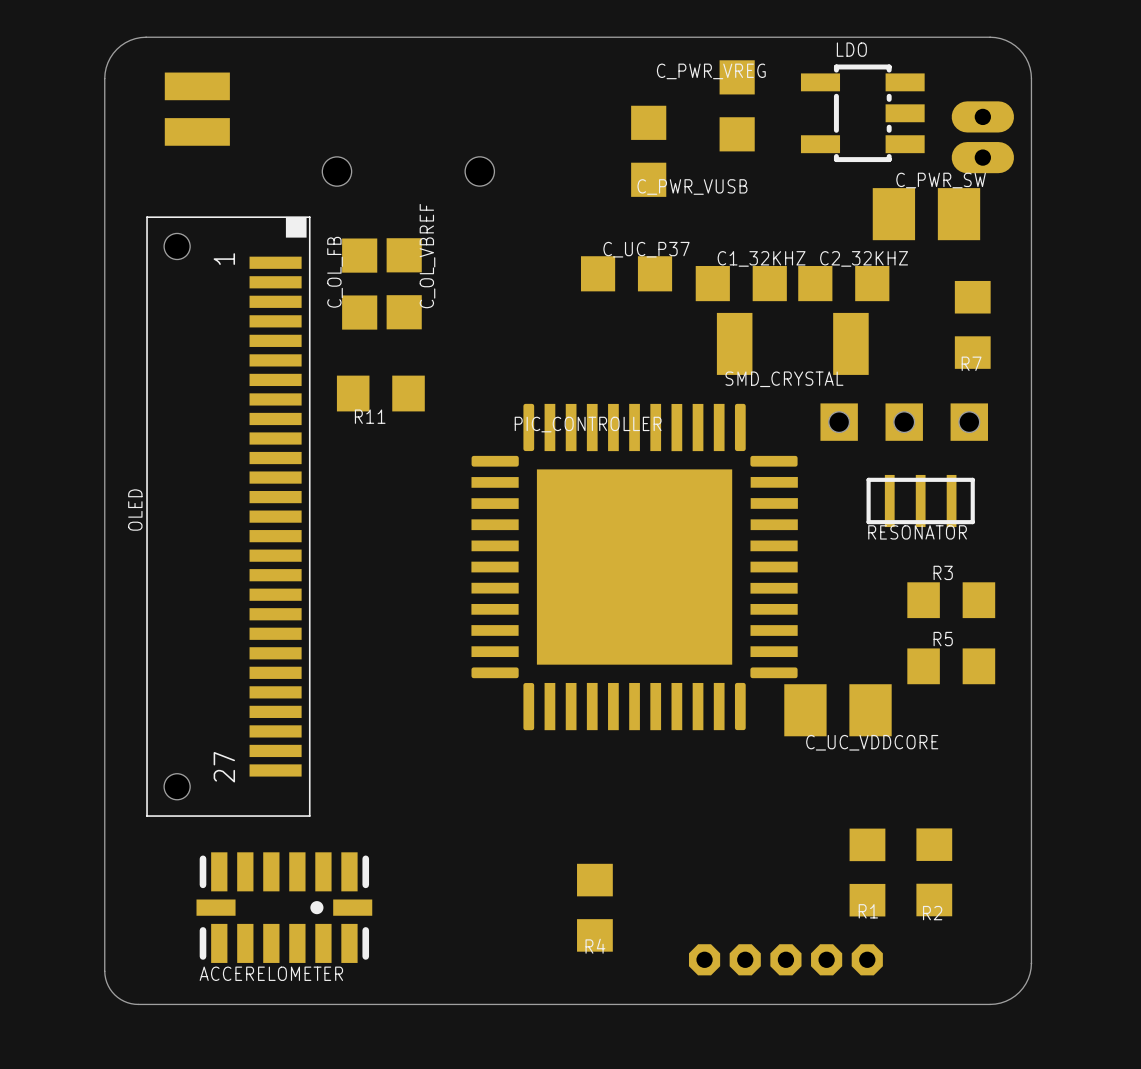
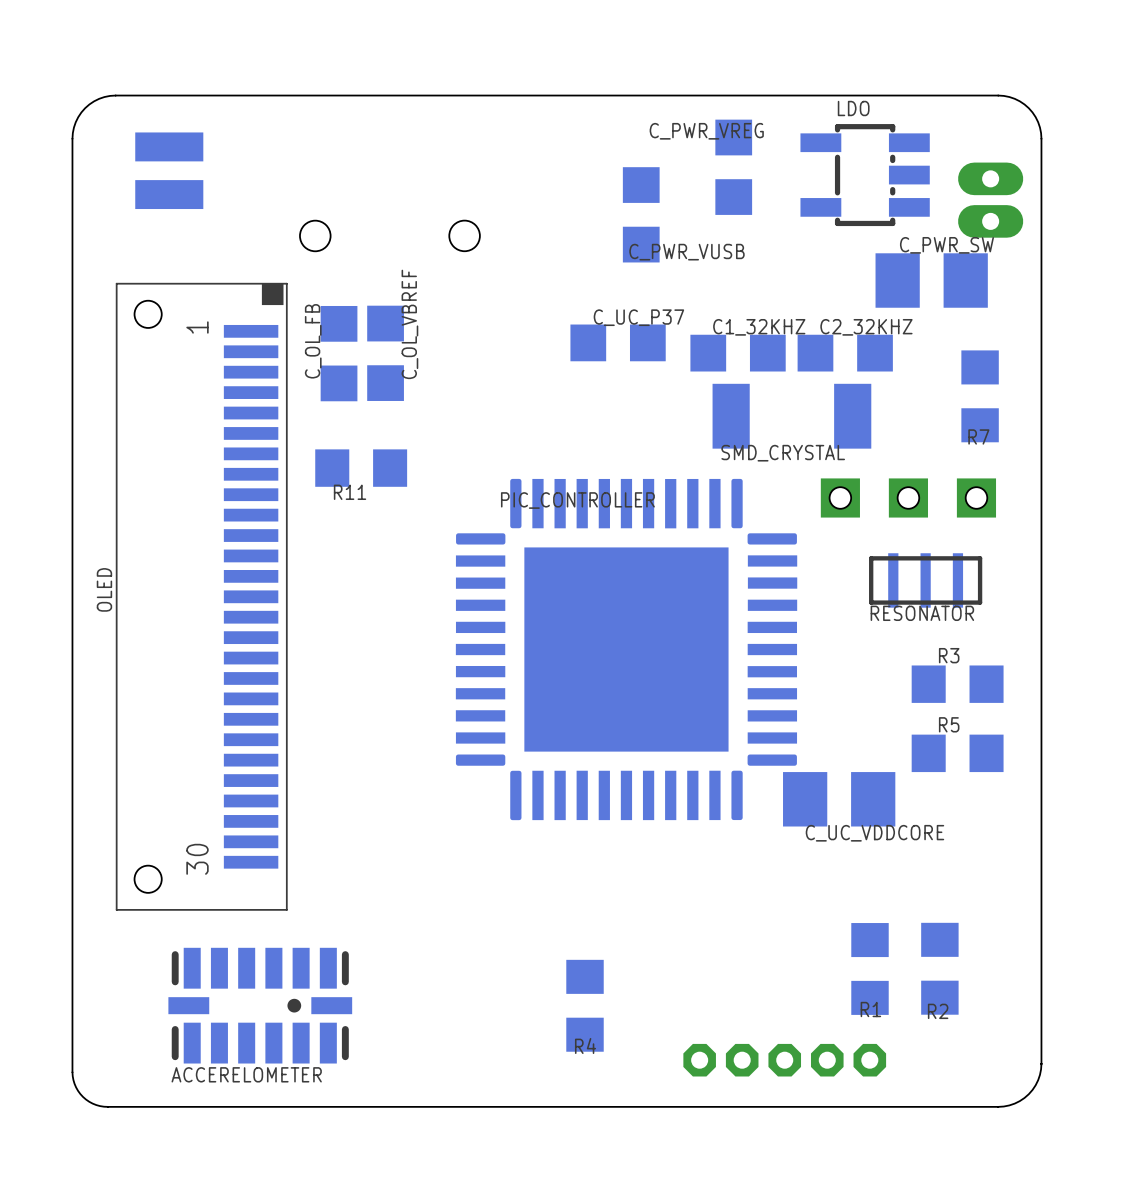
part text: 27 (224, 767) -> 30 (197, 859)

